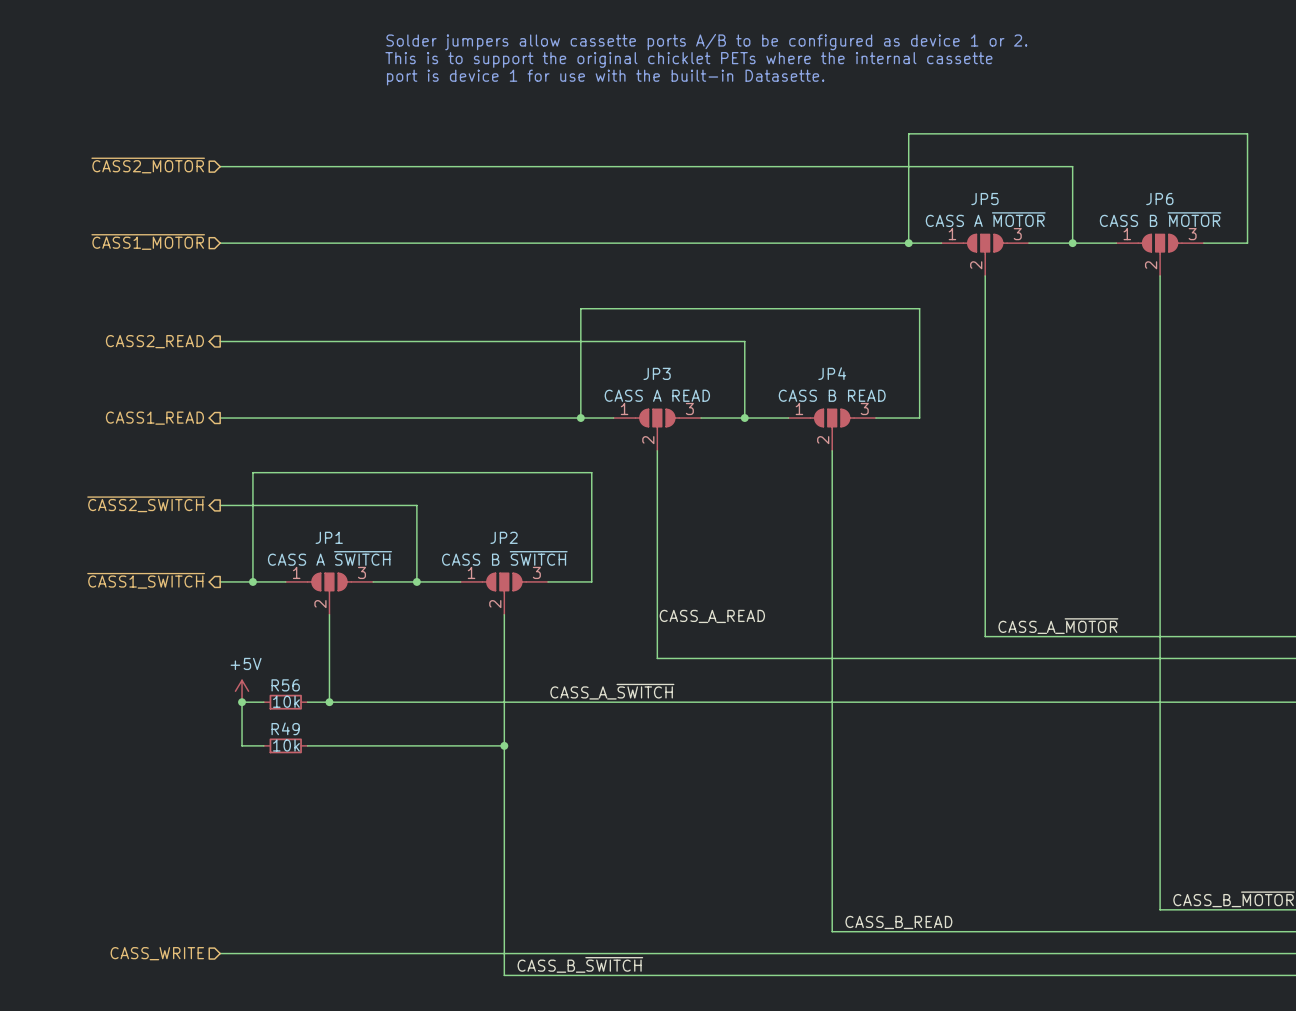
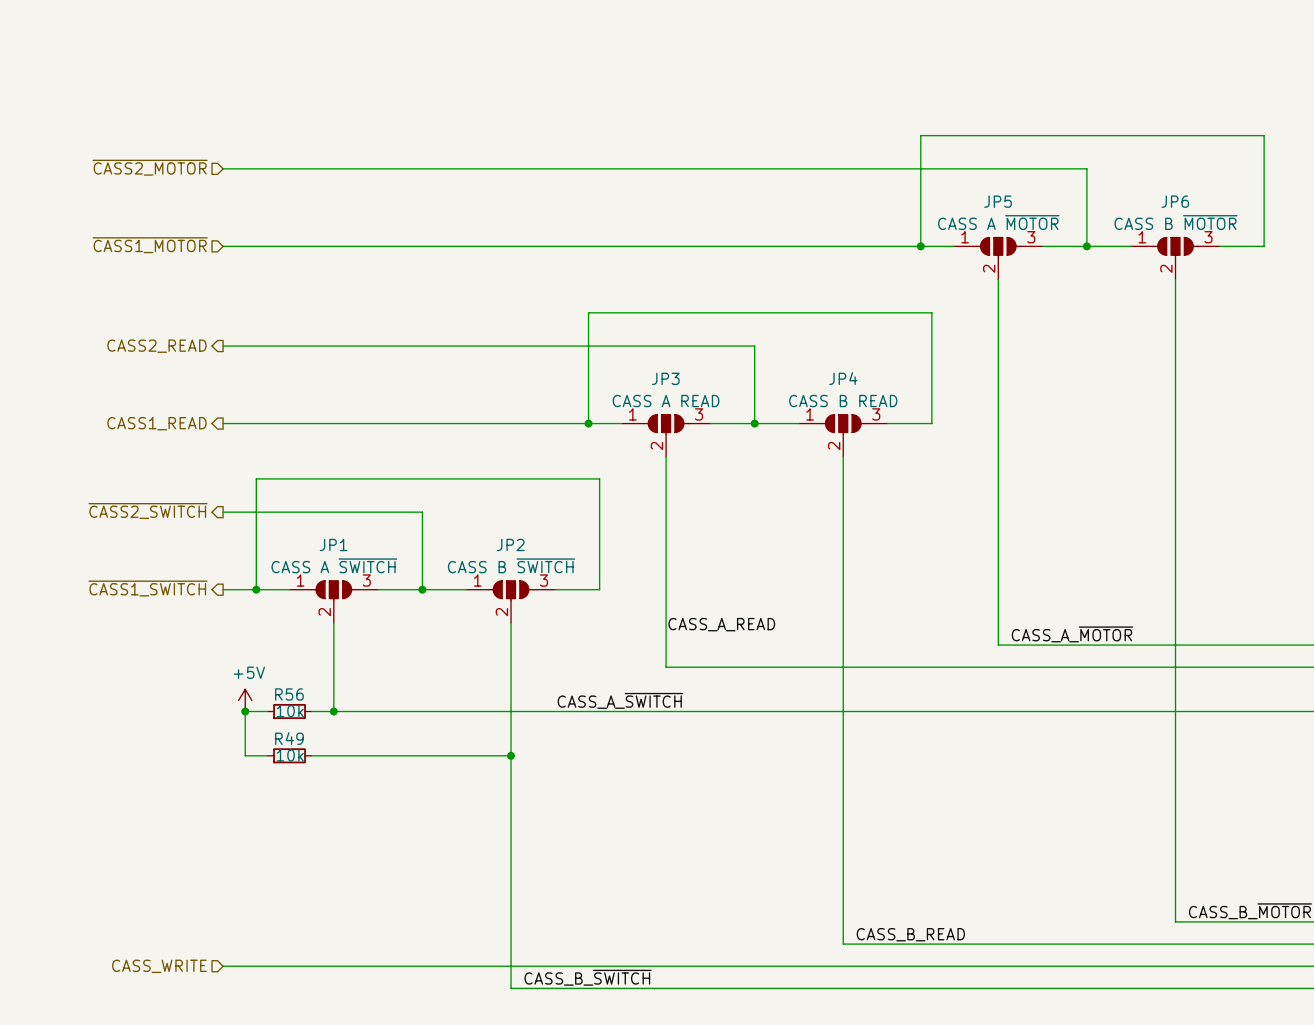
text: Solder jumpers allow cassette ports A/B to be configured as device 1 or 2. (706, 42) -> none
text: This is to support the original chicklet PETs where the internal cassette (688, 59) -> none
text: port is device 1 for use with the built-in Datasette. (605, 77) -> none

